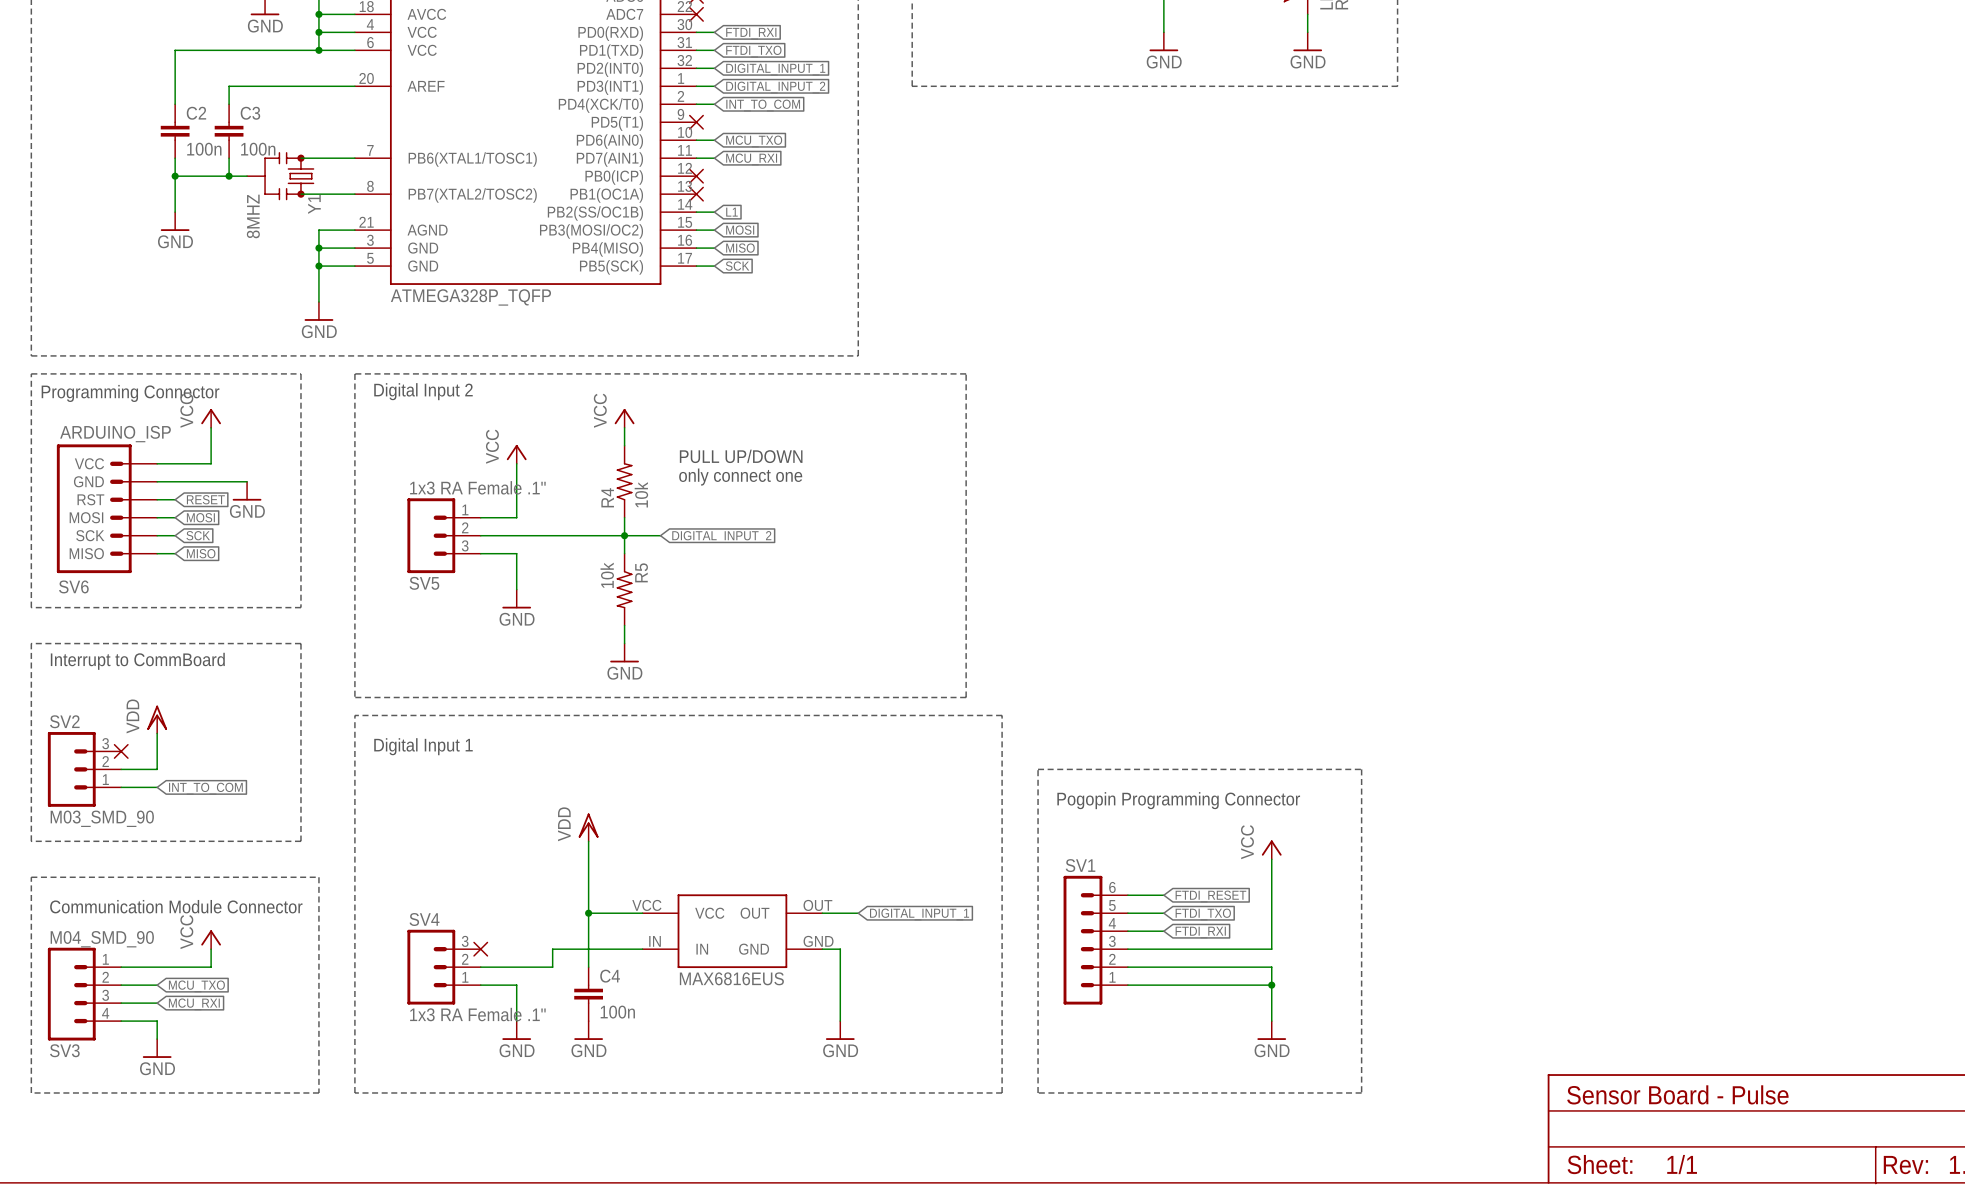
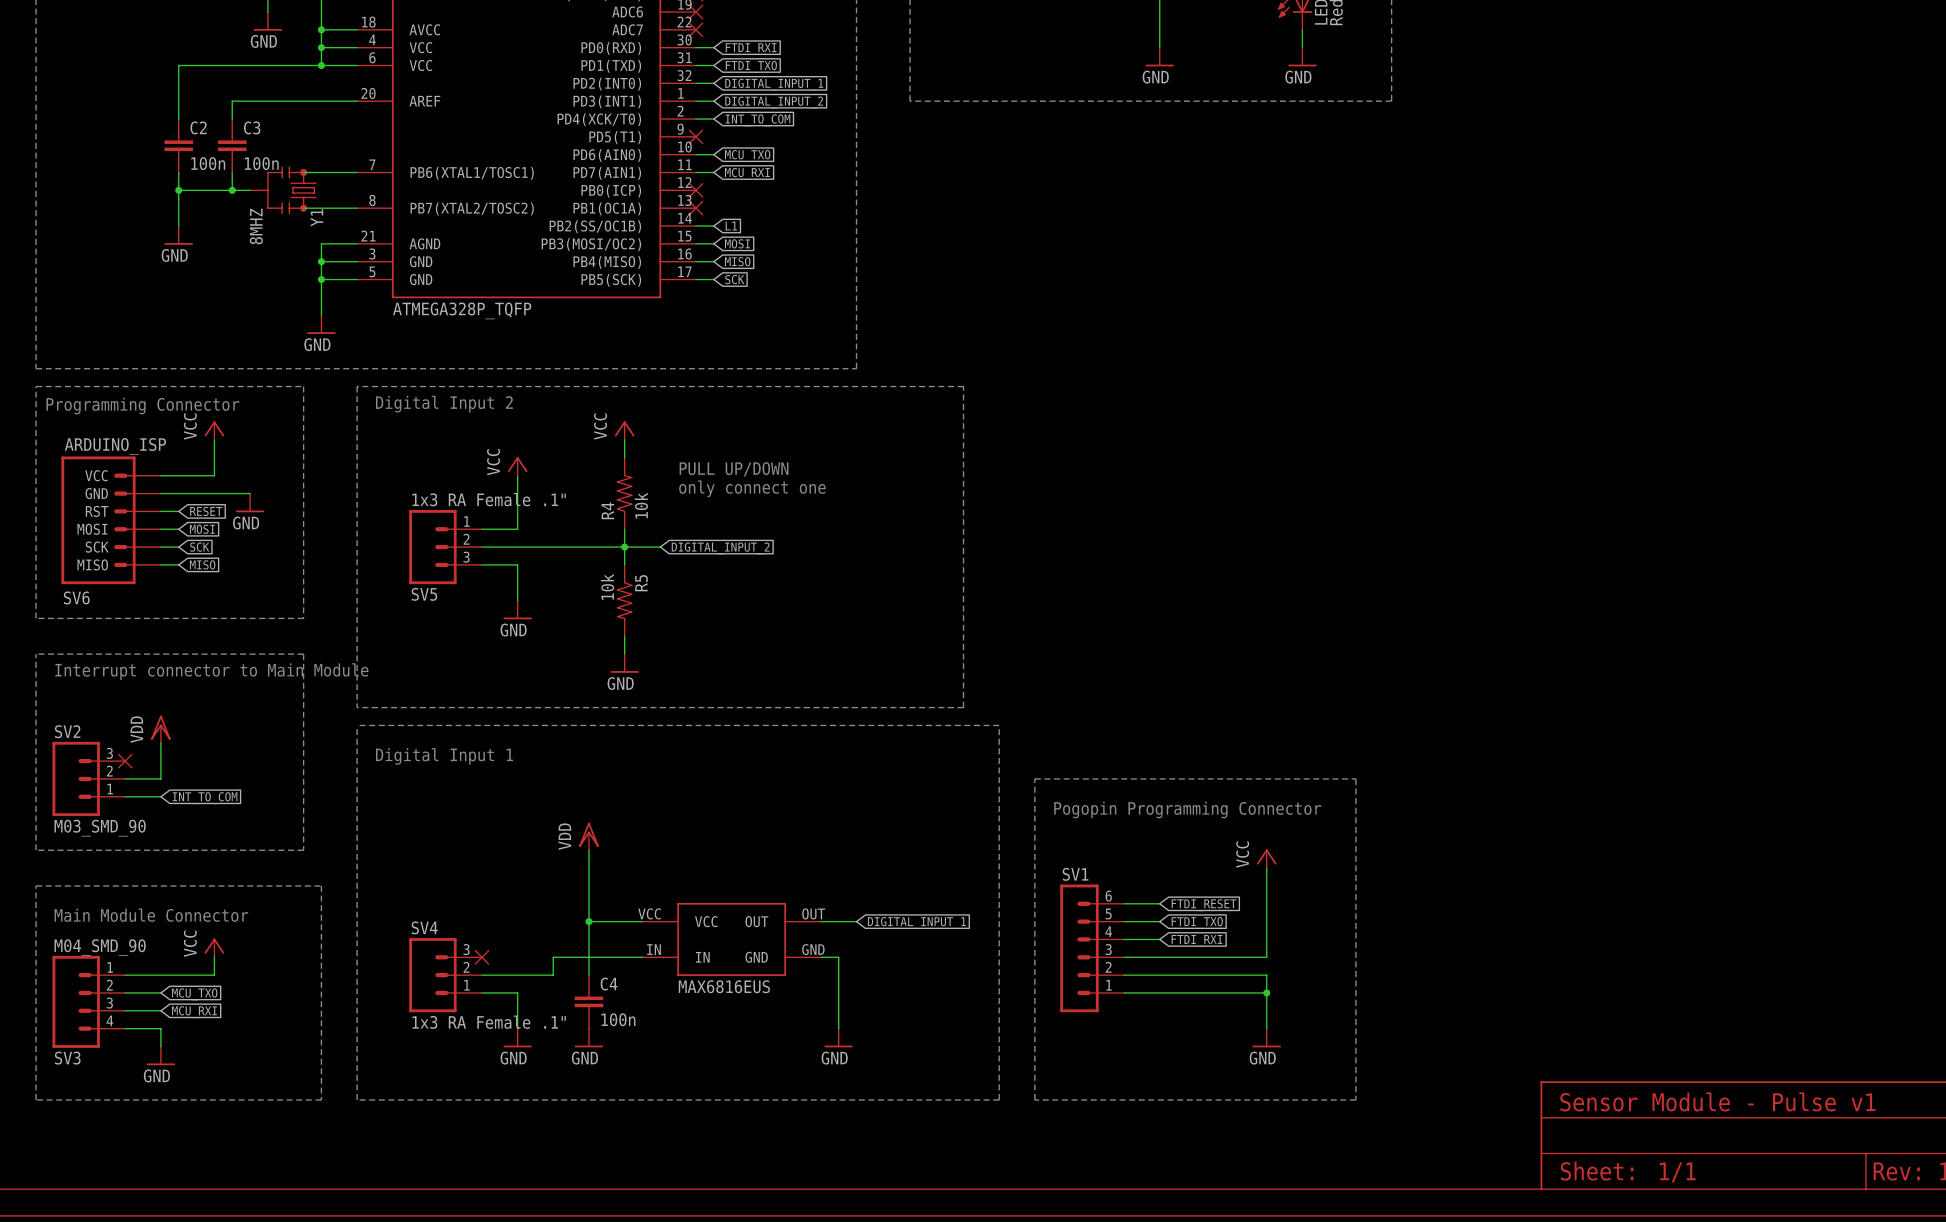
text: Interrupt to CommBoard (137, 661) -> Interrupt connector to Main Module (211, 671)
text: Communication Module Connector (176, 906) -> Main Module Connector (151, 915)
text: Sensor Board - Pulse (1677, 1094) -> Sensor Module - Pulse v1 (1717, 1101)

